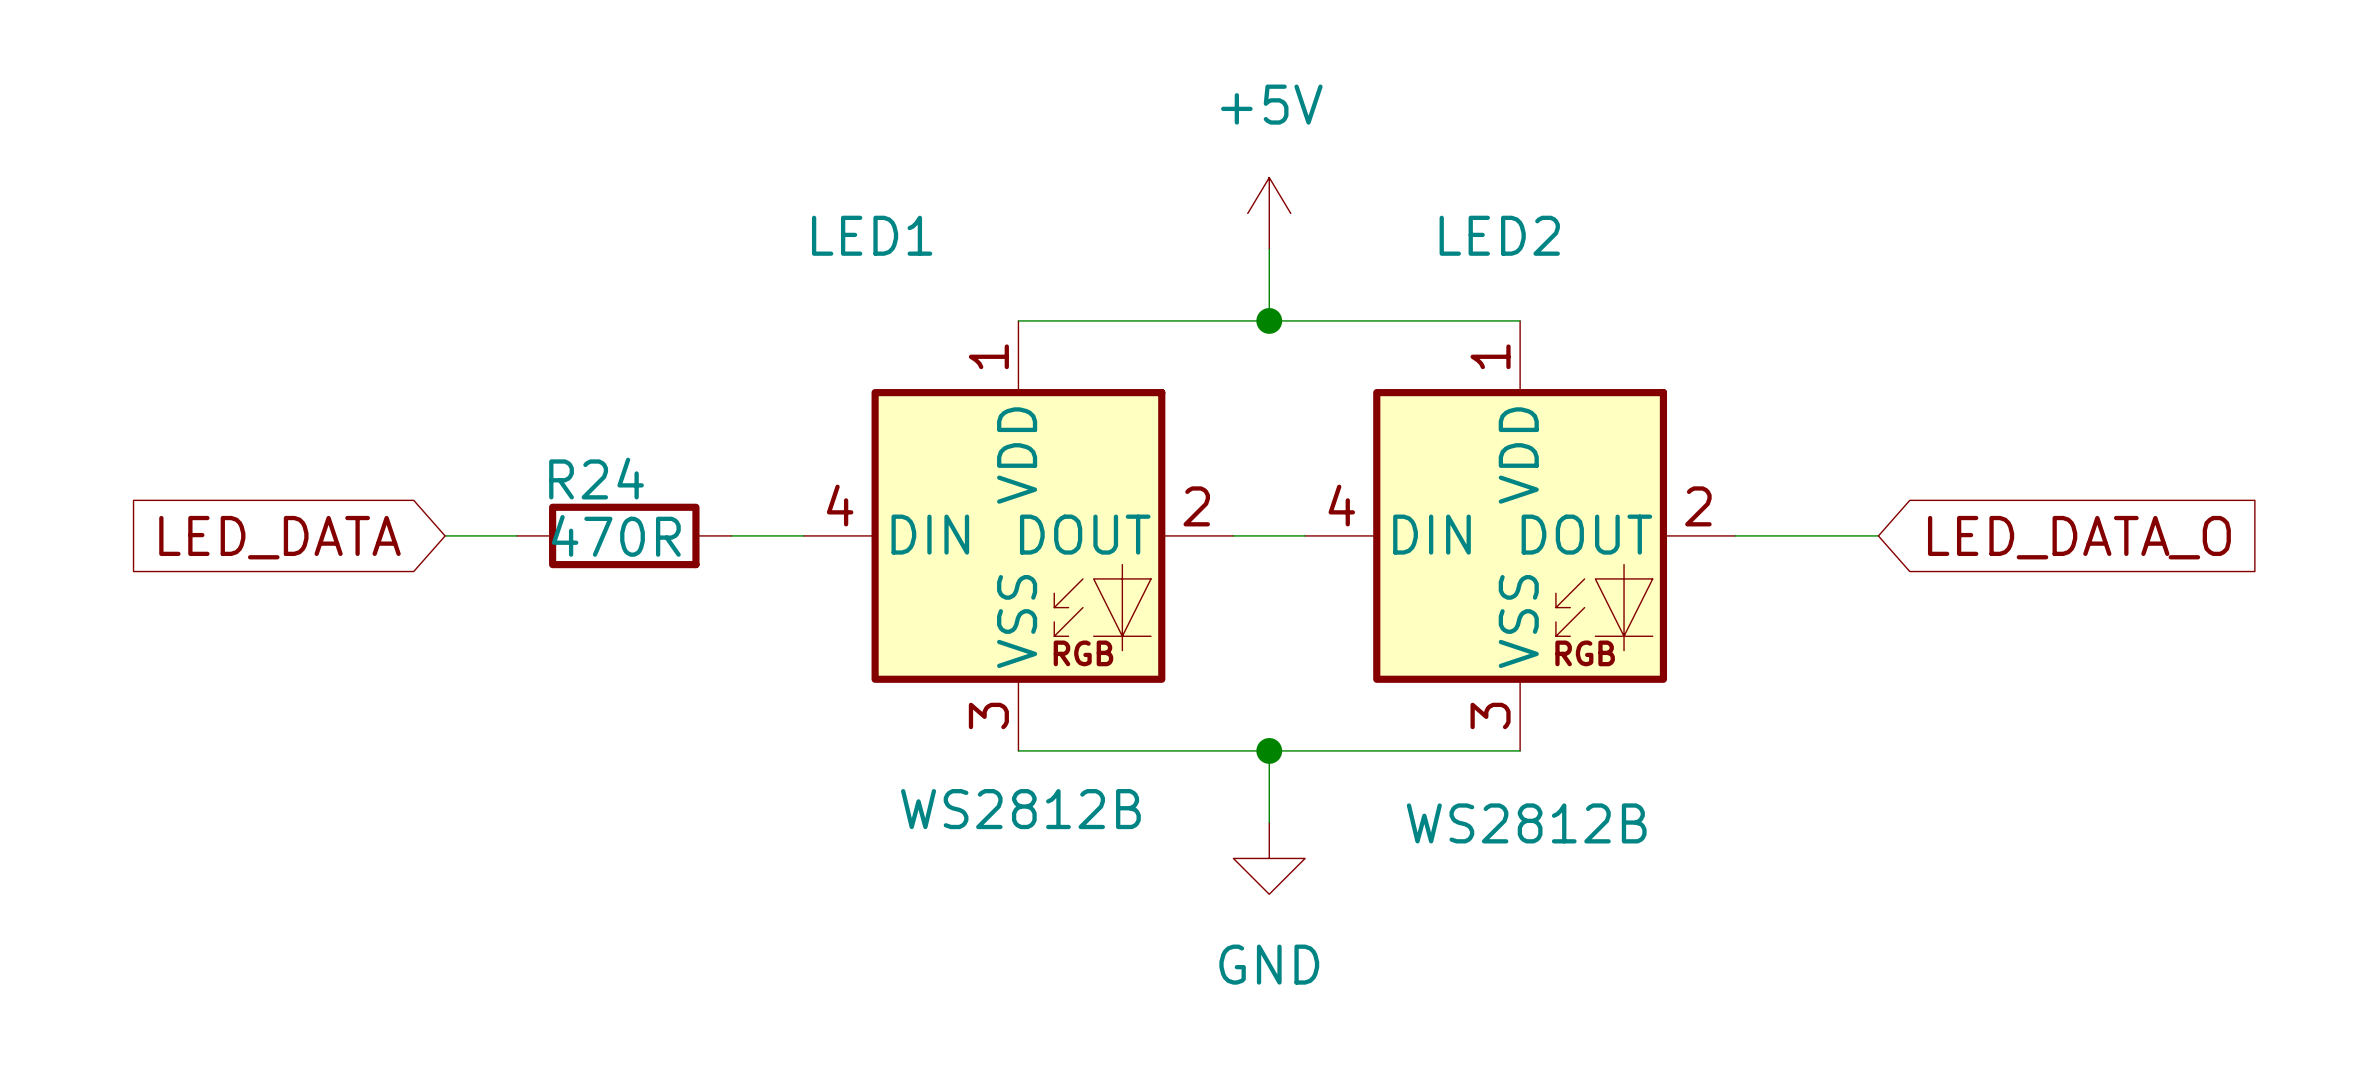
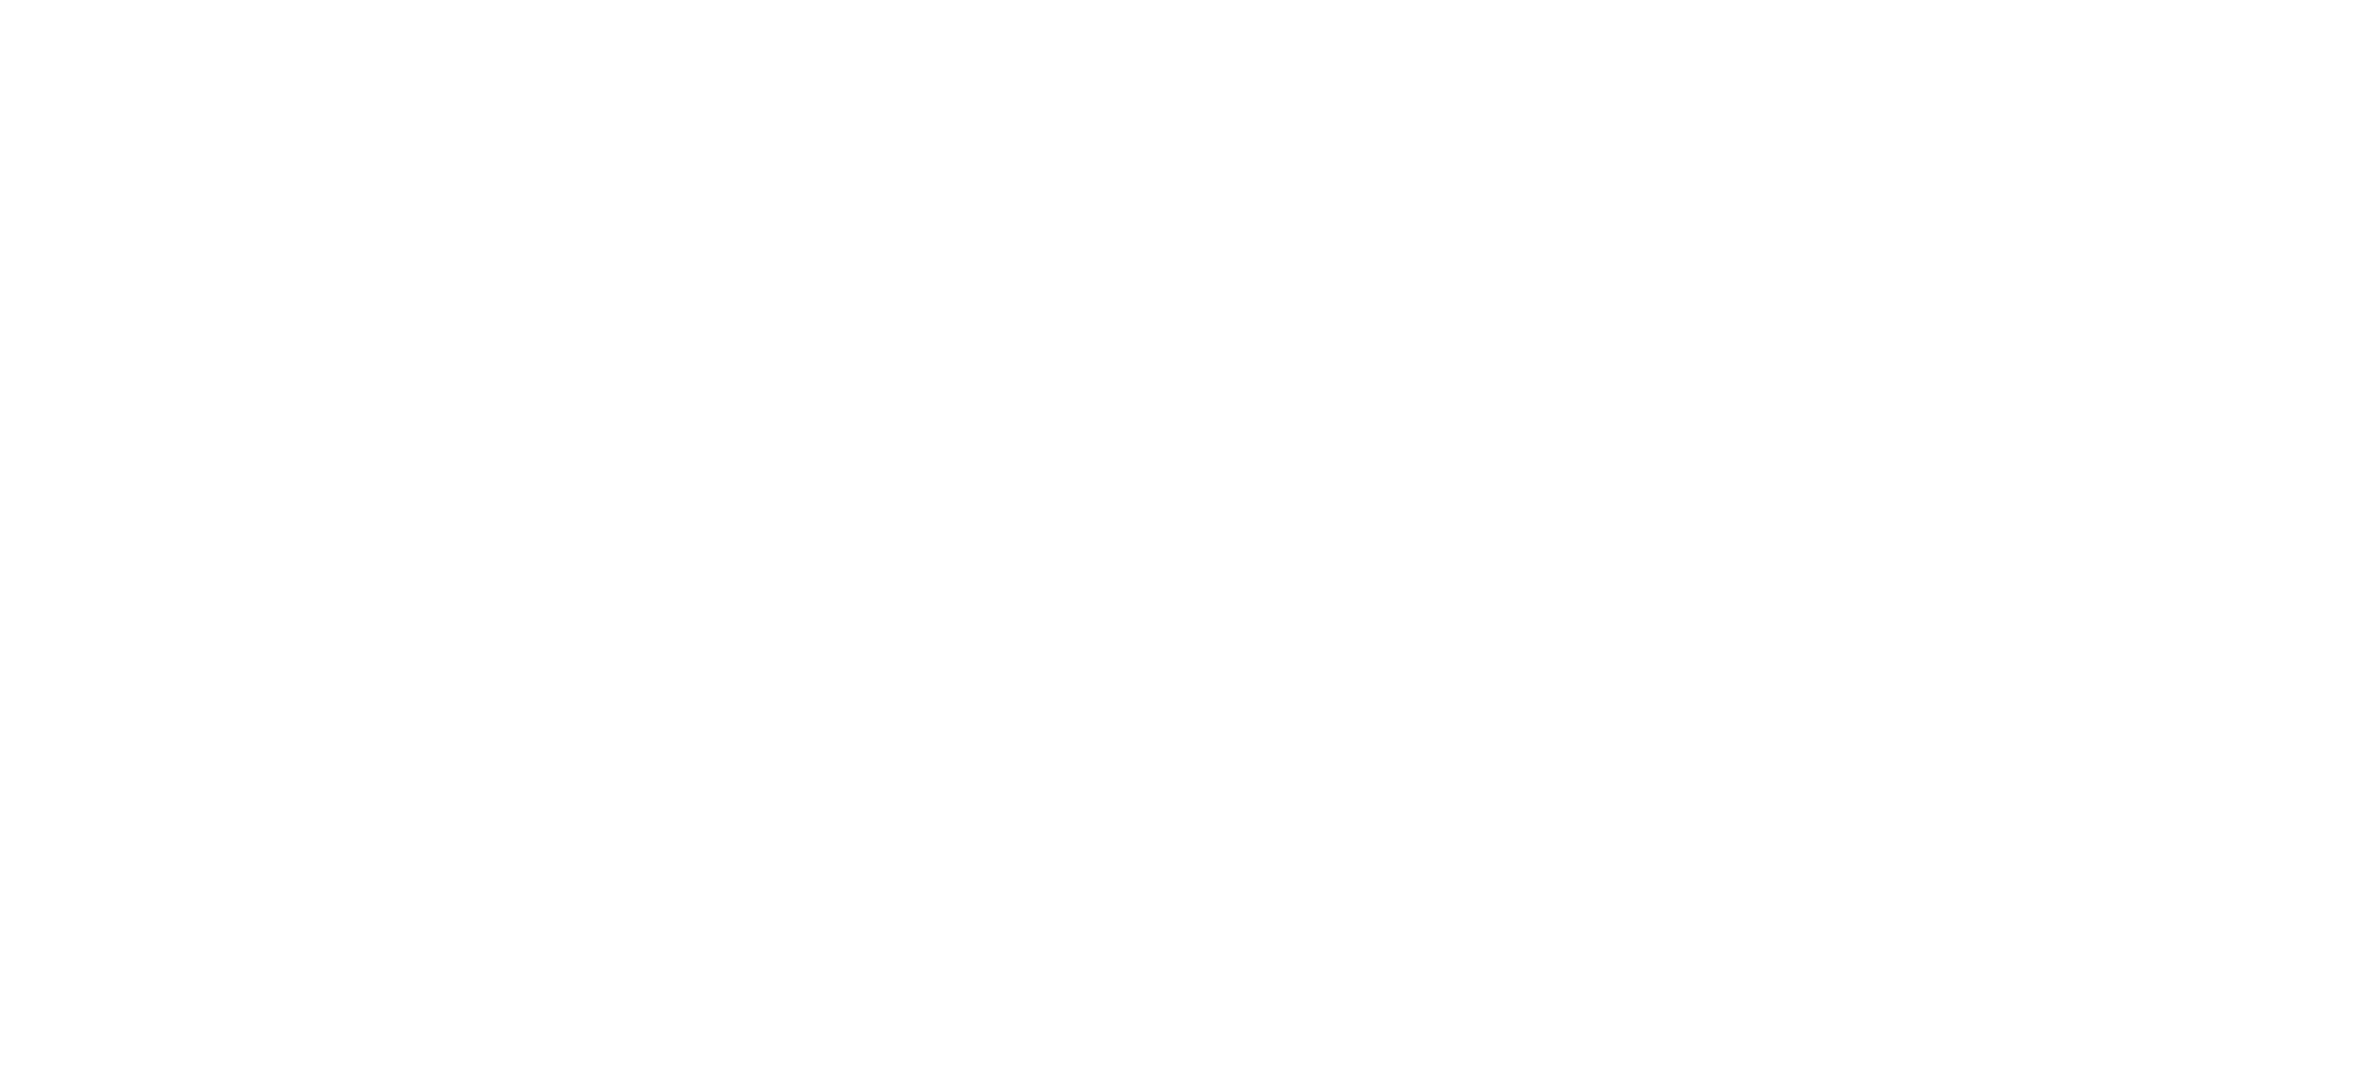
power symbol: +5V (1269, 213) -> none
wire: (1269, 249) (1269, 320) -> none
wire: (1018, 320) (1520, 320) -> none
junction: (1269, 320) -> none
wire: (445, 535) (516, 535) -> none
R24: 470R (624, 535) -> none
wire: (731, 535) (803, 535) -> none
LED1: WS2812B (1018, 535) -> none
wire: (1233, 535) (1305, 535) -> none
LED2: WS2812B (1520, 535) -> none
wire: (1735, 535) (1878, 535) -> none
global label: LED_DATA (279, 537) -> none
global label: LED_DATA_O (2079, 537) -> none
wire: (1018, 750) (1520, 750) -> none
wire: (1269, 750) (1269, 822) -> none
junction: (1269, 750) -> none
power symbol: GND (1269, 858) -> none

